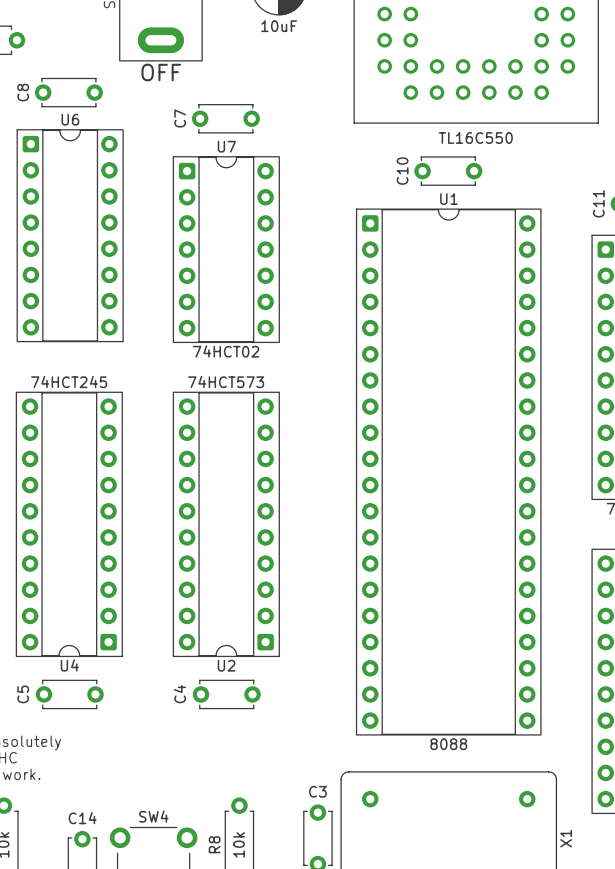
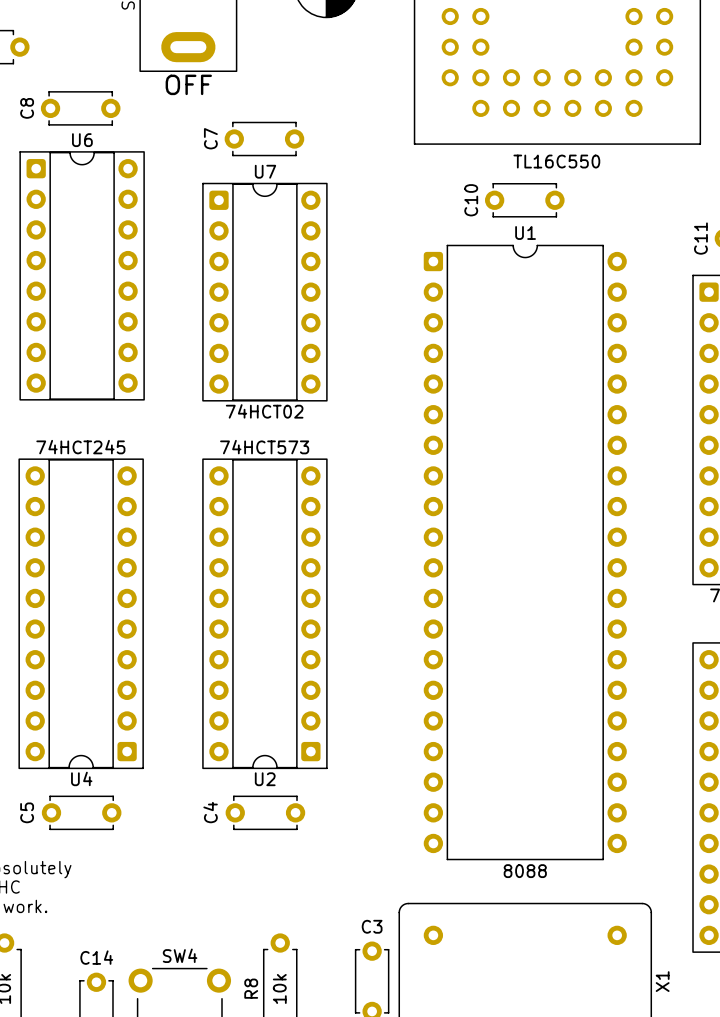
part value: 10uF (279, 26) -> none
U1 footprint: [355, 208, 542, 736] -> [423, 244, 627, 861]

